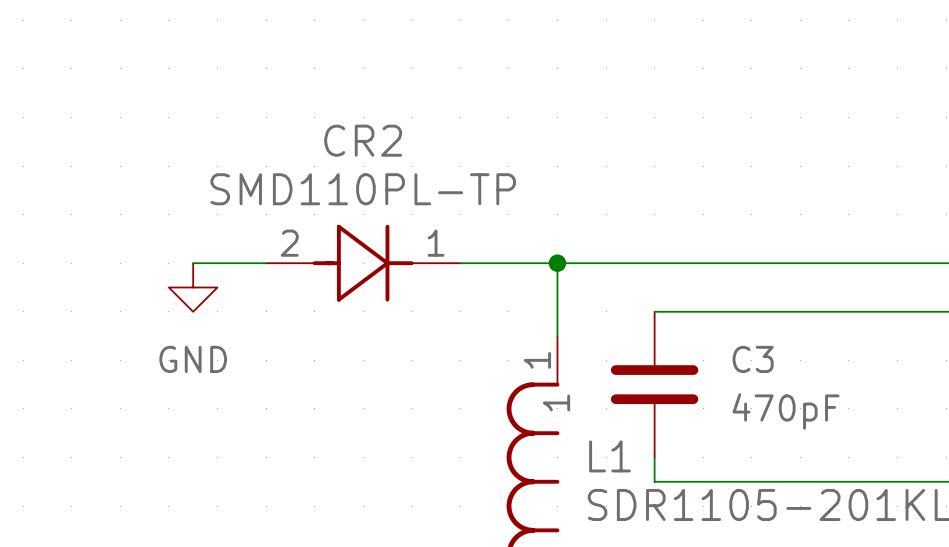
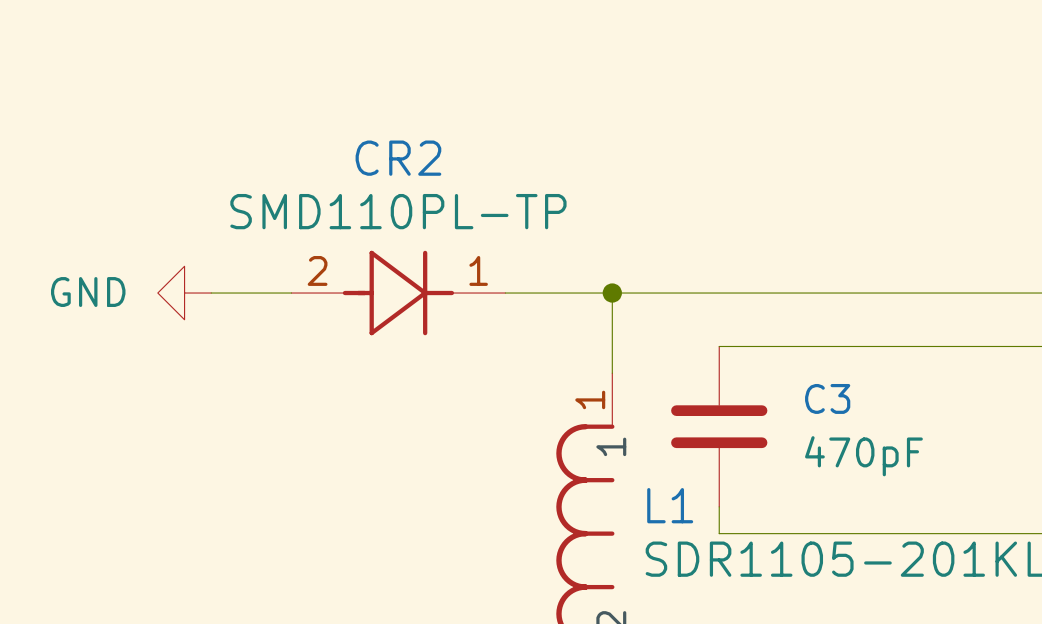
power symbol rotation: 0° (193, 287) -> 90° clockwise (184, 293)
power symbol position: GND (193, 287) -> GND (184, 293)

